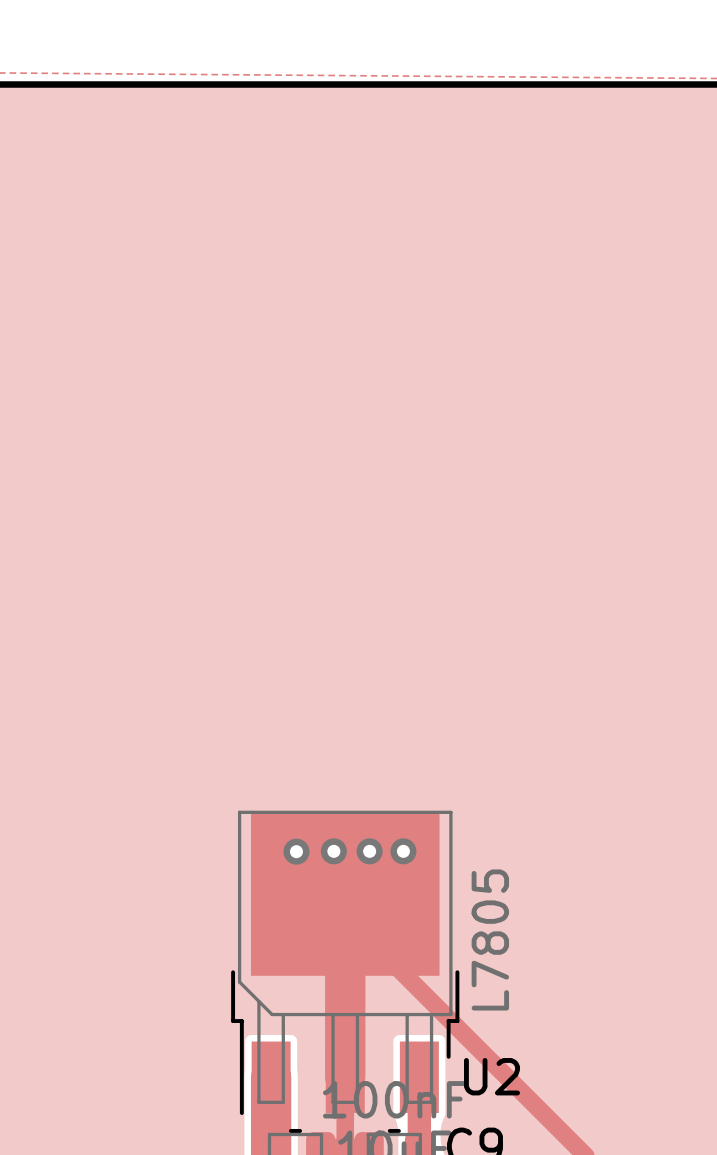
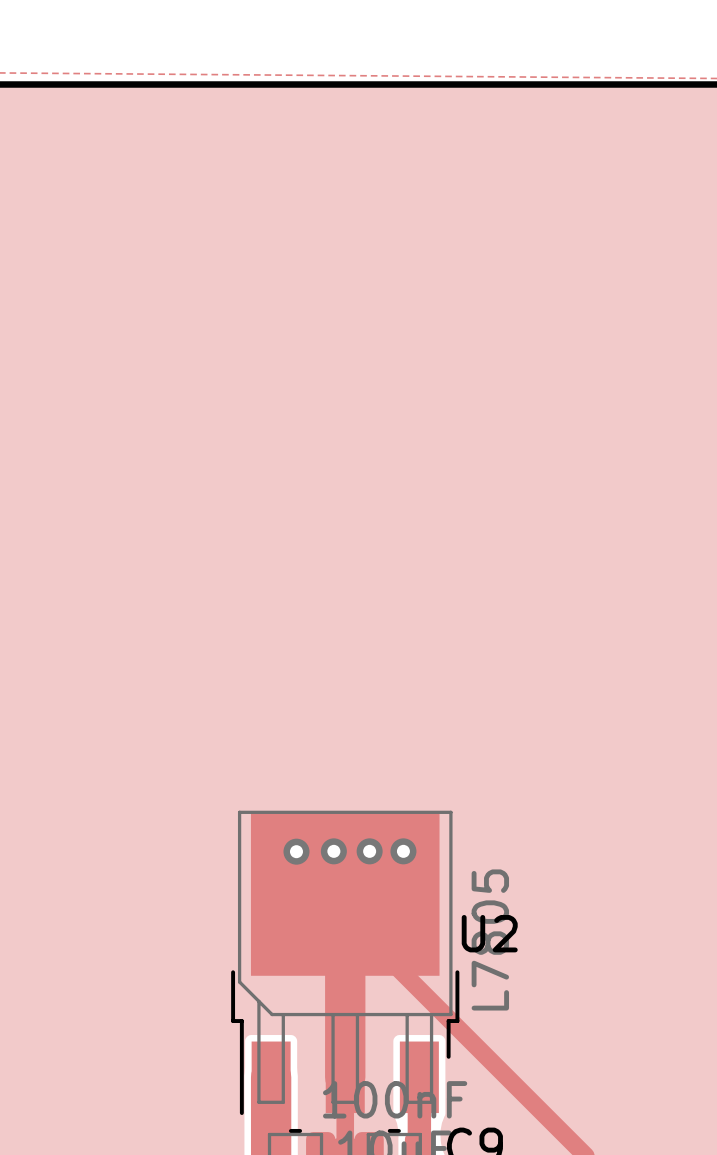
U2 name position: U2 (491, 1076) -> U2 (489, 933)

